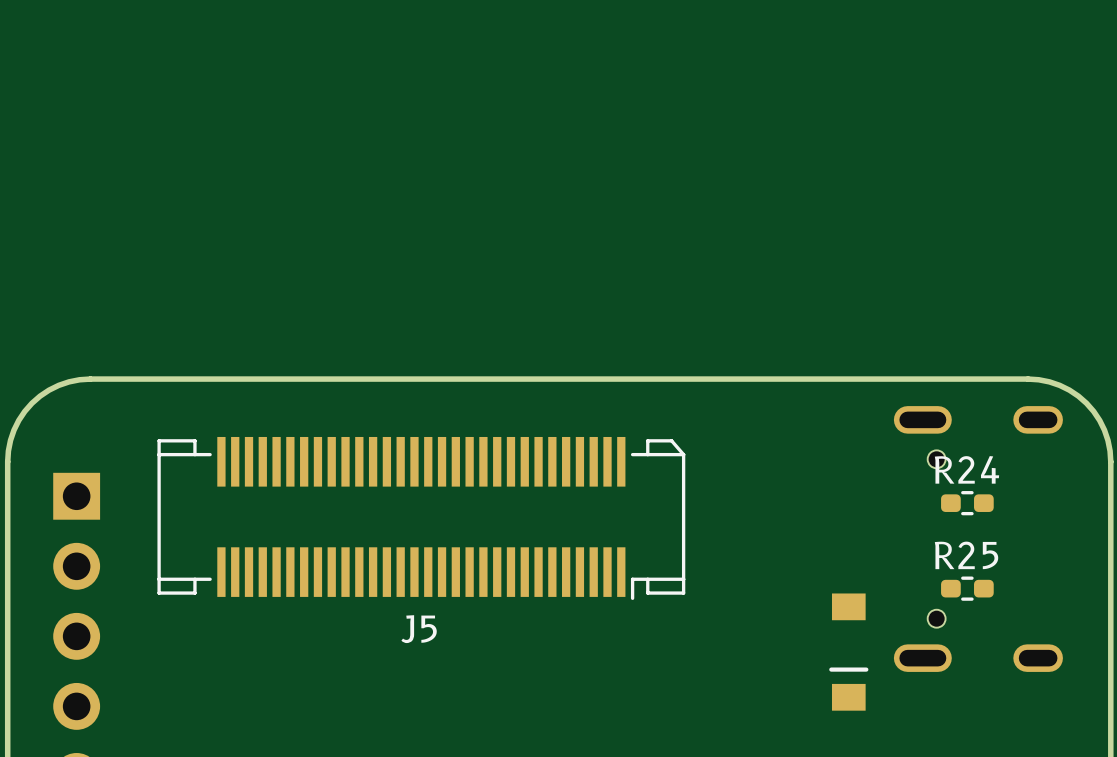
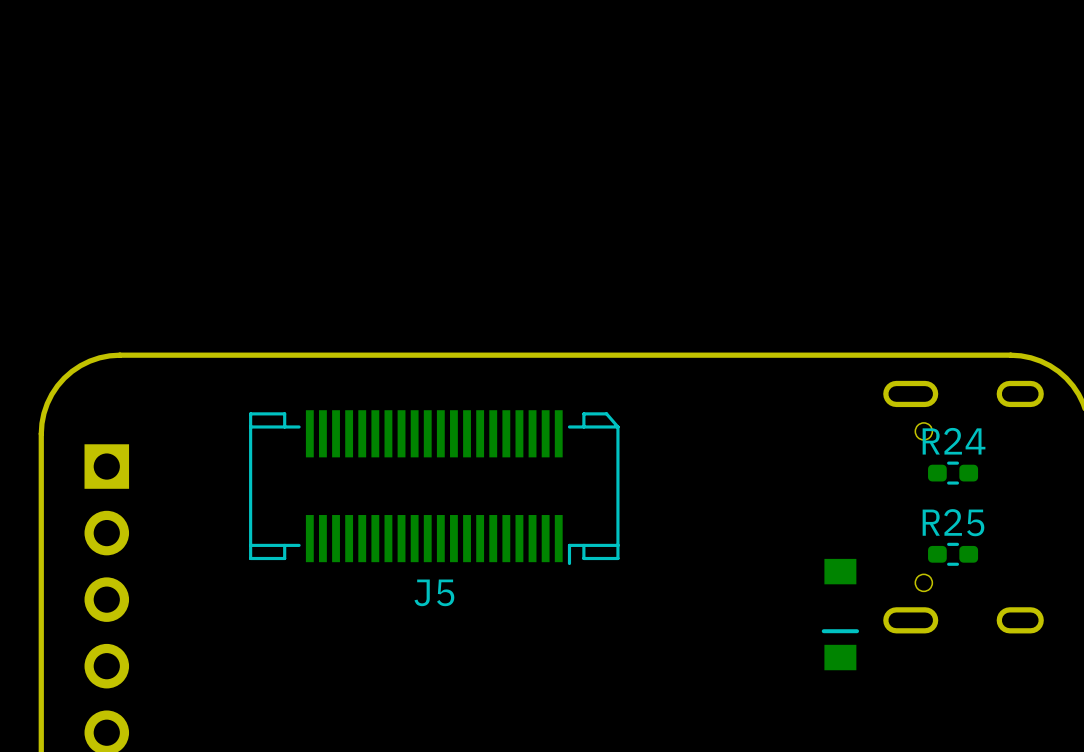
J5 footprint: [157, 436, 686, 600] -> [249, 410, 620, 566]

